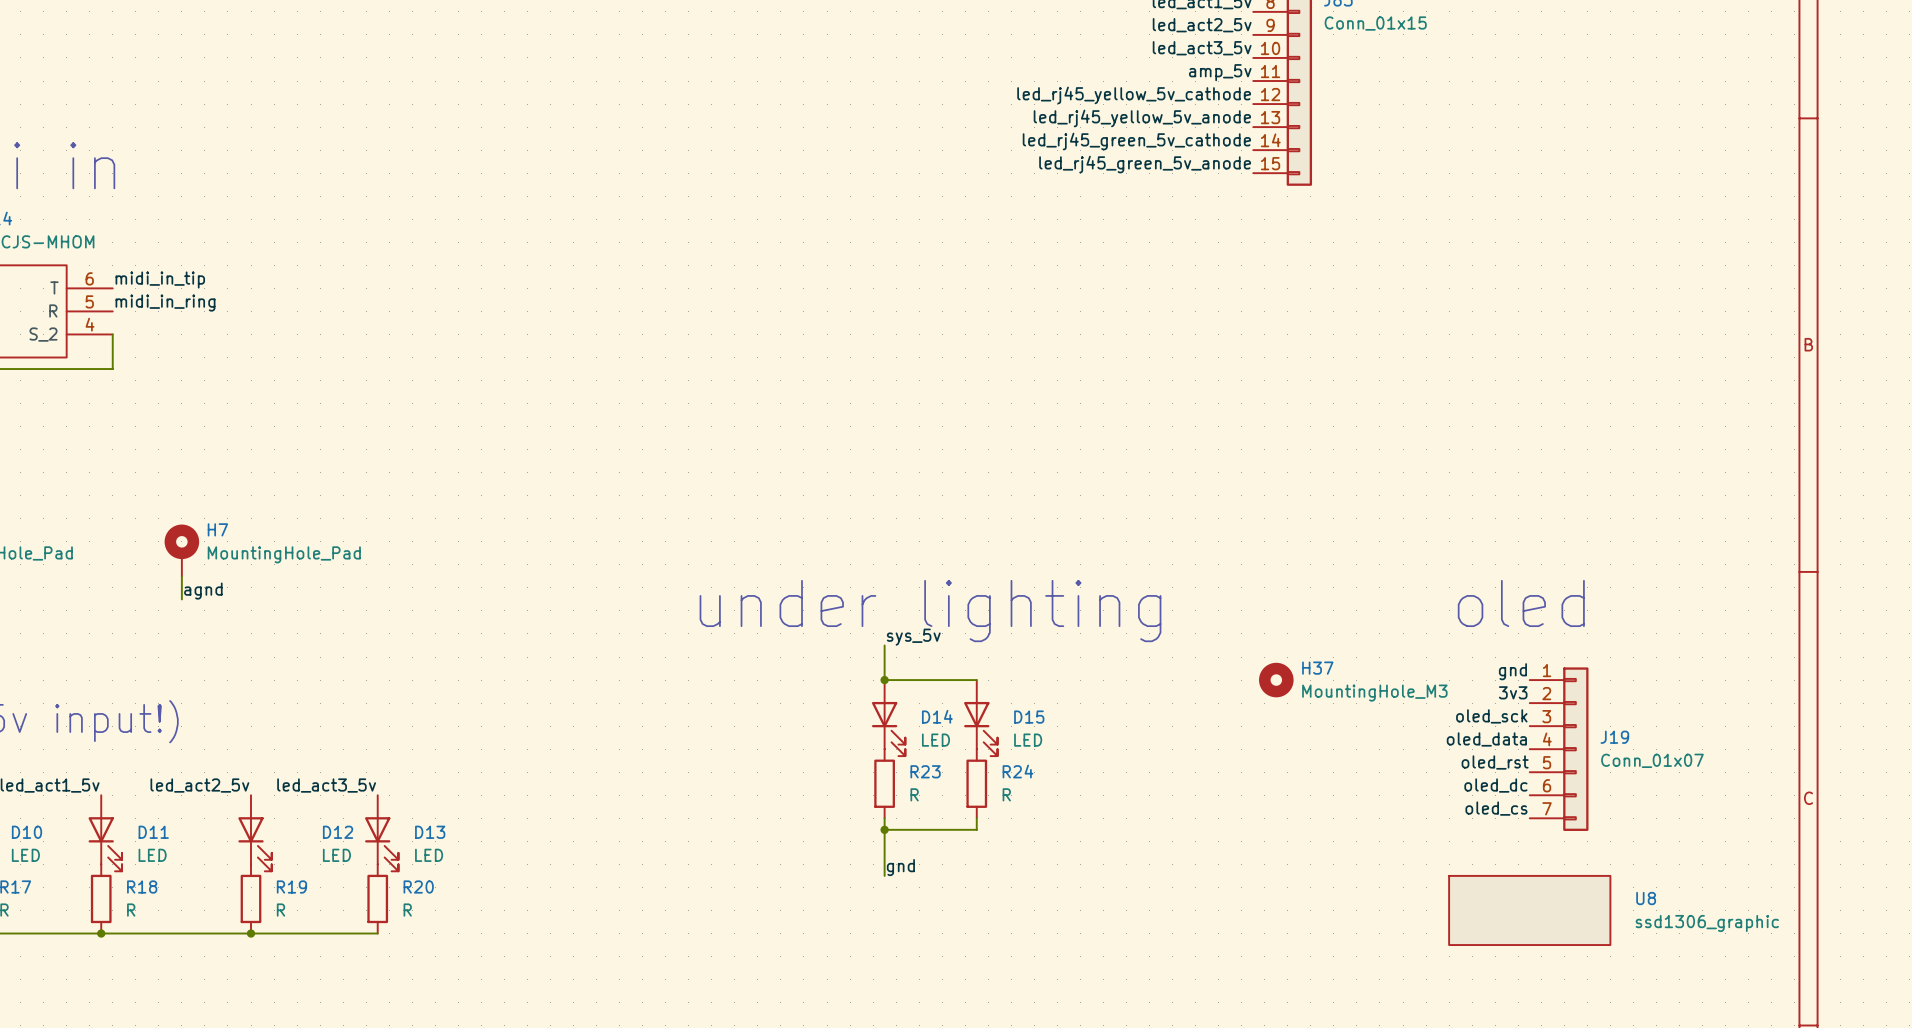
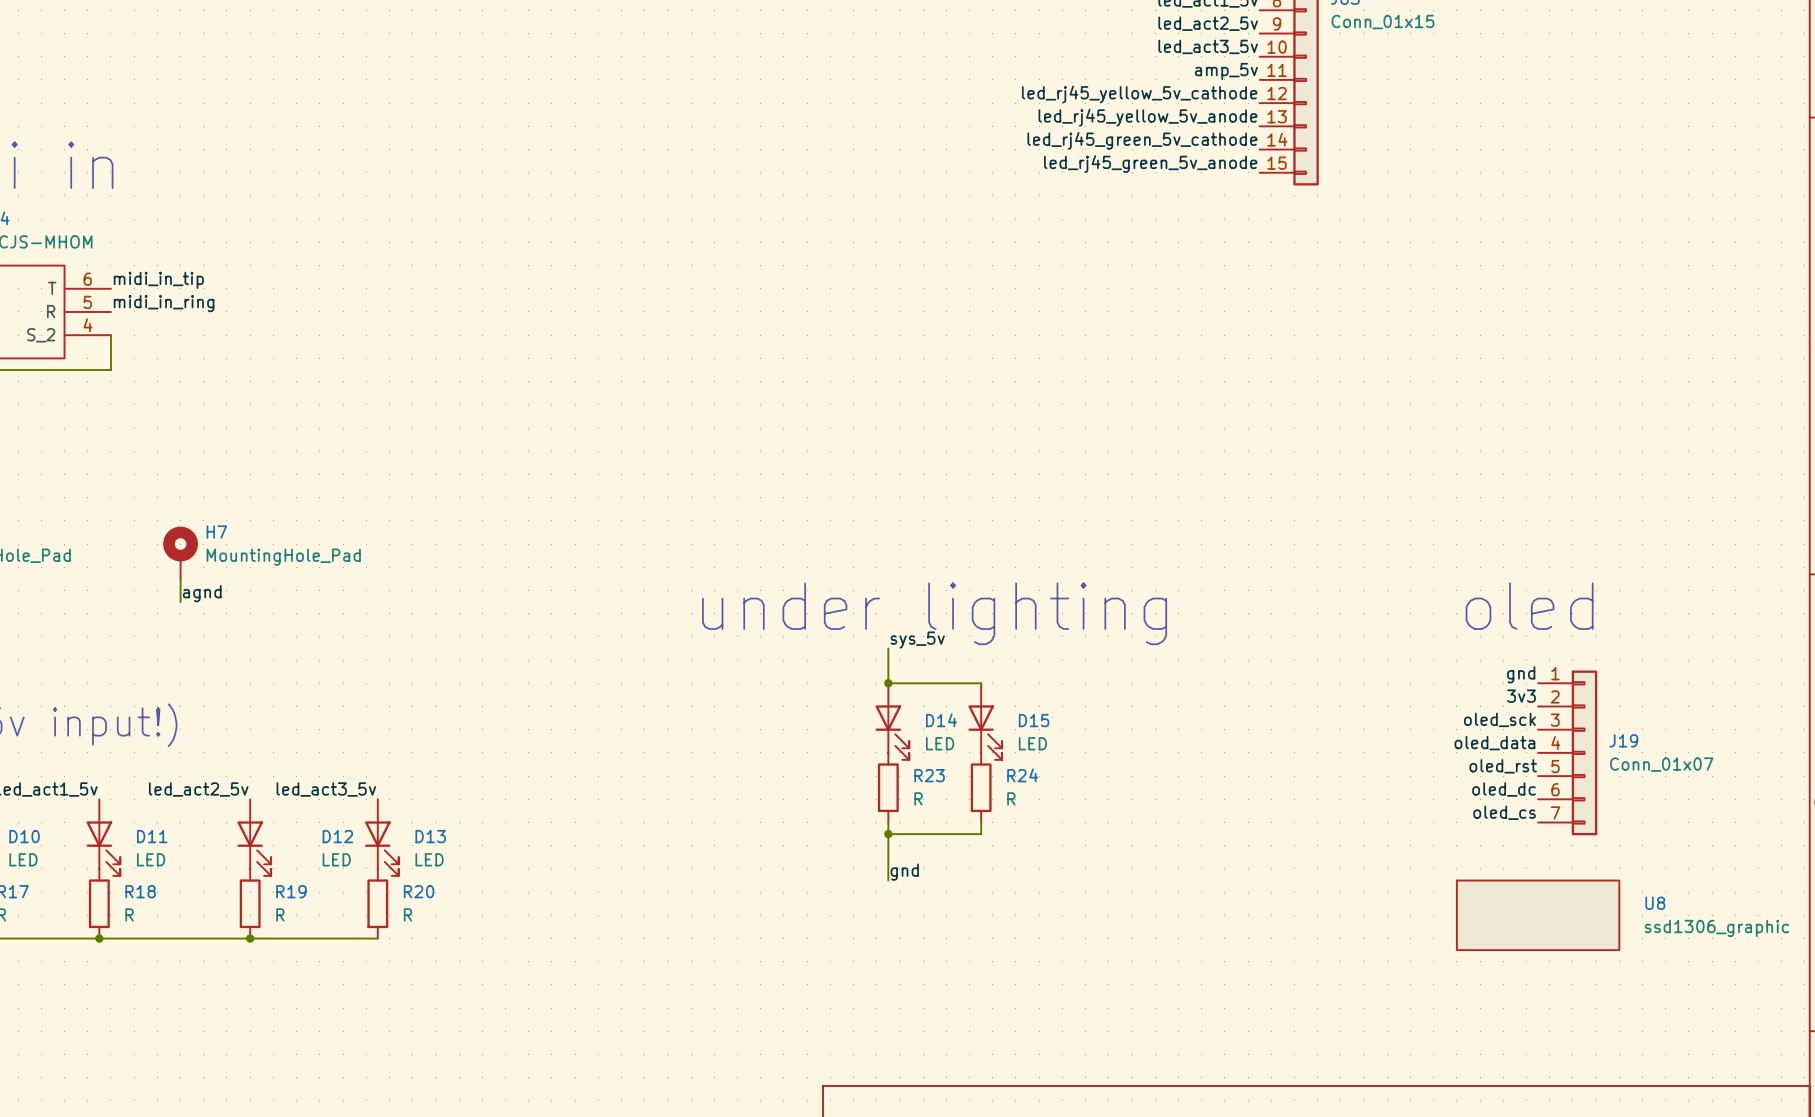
H37: MountingHole_M3 (1276, 680) -> none

